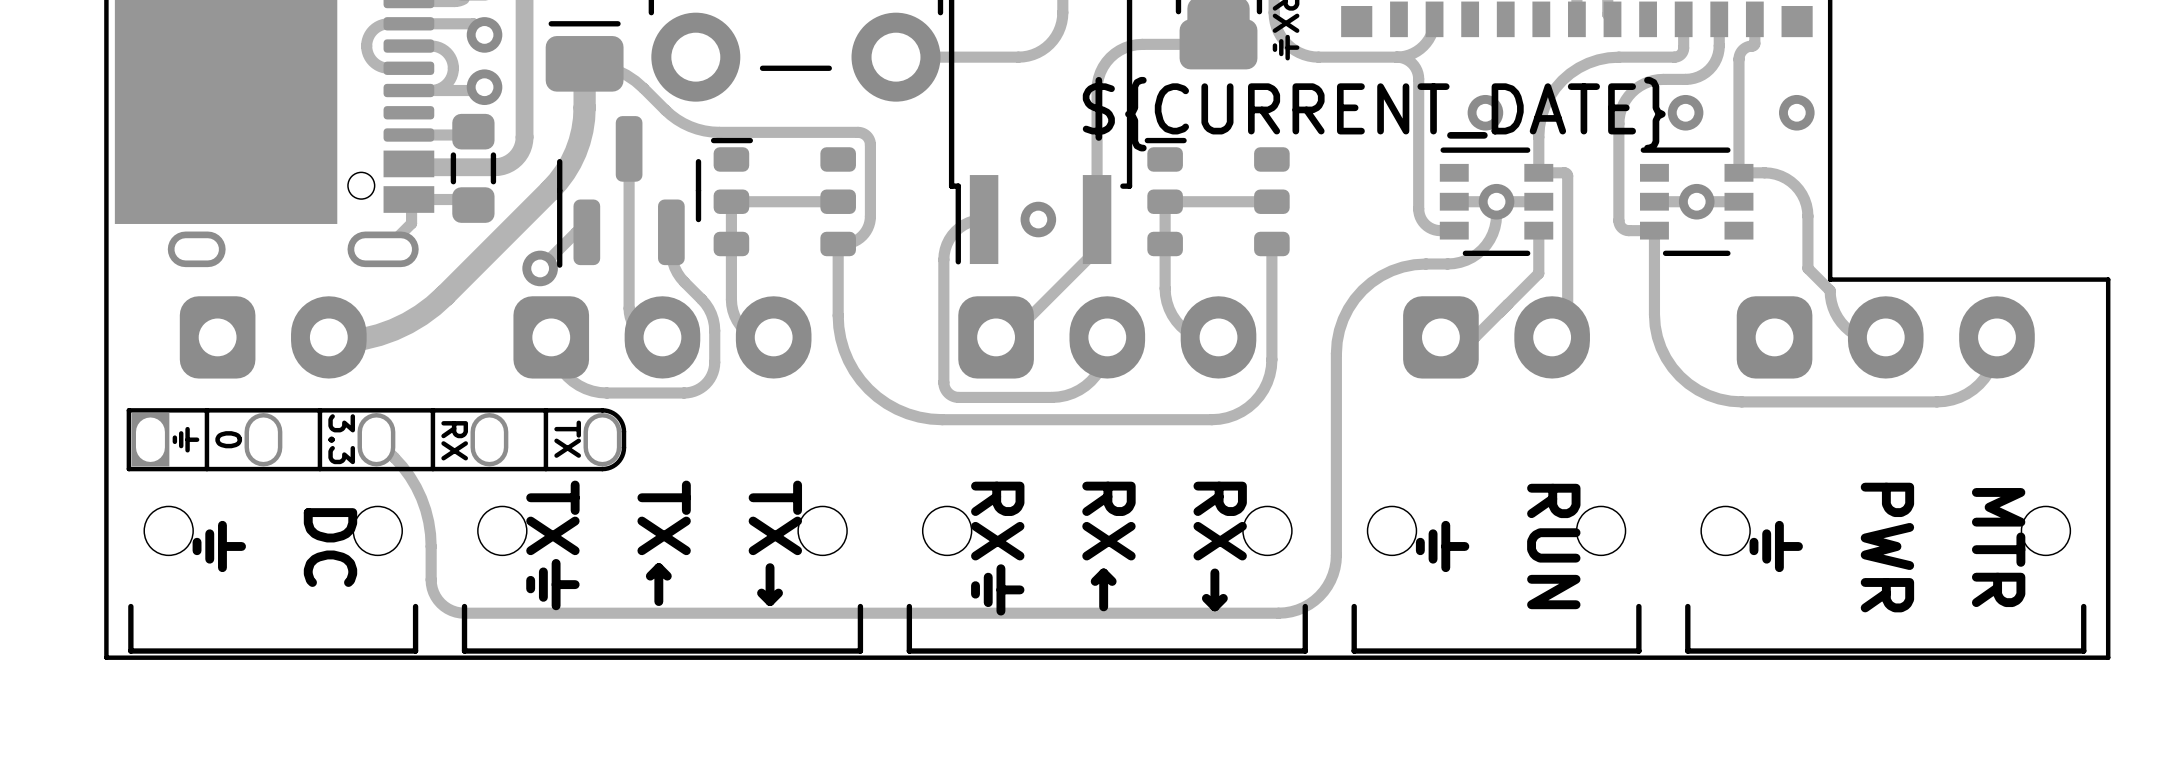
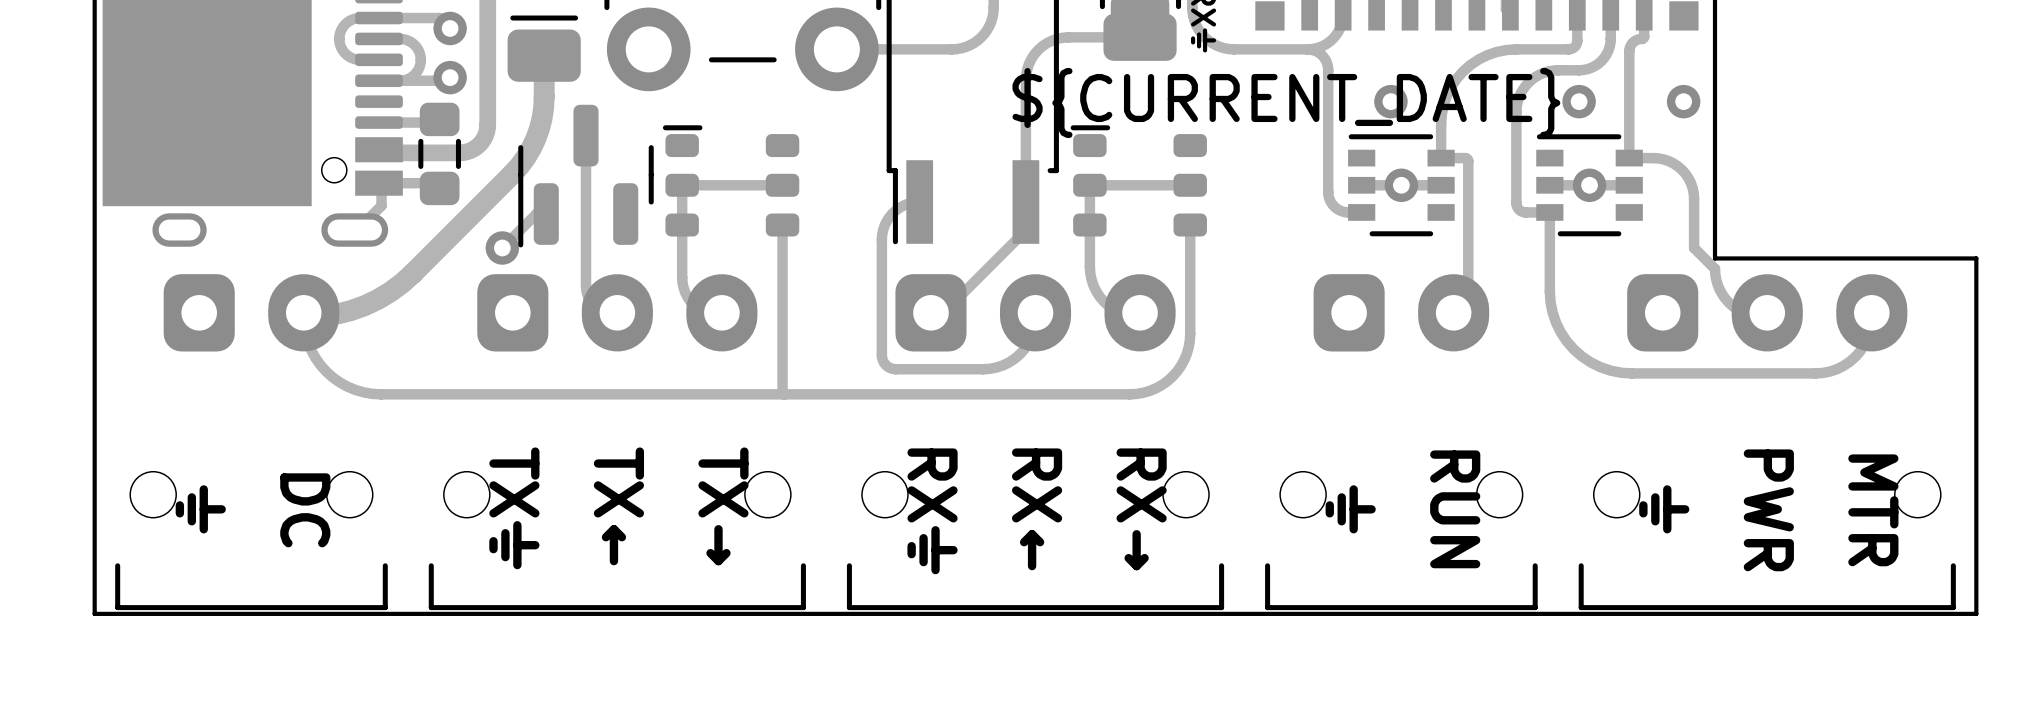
track: (584, 63) (606, 66) (626, 75) (643, 88) (670, 115) (697, 129) (719, 132) (857, 132) (865, 134) (870, 144) (869, 222) (864, 233) (857, 239) (848, 243) (838, 243) -> none
track: (1496, 201) (1496, 221) (1492, 233) (1486, 244) (1477, 253) (1466, 260) (1453, 263) (1414, 264) (1391, 270) (1371, 282) (1354, 299) (1348, 308) (1339, 330) (1336, 353) (1334, 568) (1330, 580) (1319, 596) (1309, 604) (1291, 611) (460, 612) (444, 606) (433, 592) (431, 584) (428, 521) (416, 487) (402, 466) (376, 439) -> none
via: (1038, 219) -> none
track: (1538, 230) (1538, 273) (1474, 337) (1440, 337) -> none
track: (671, 232) (671, 256) (674, 267) (680, 277) (705, 303) (713, 319) (714, 365) (710, 378) (703, 386) (694, 391) (684, 393) (606, 393) (592, 391) (573, 381) (562, 371) (555, 358) (551, 337) -> none
track: (838, 315) (844, 350) (854, 371) (868, 389) (897, 409) (930, 419) (1219, 419) (1234, 415) (1254, 402) (1267, 382) (1271, 359) -> (782, 292) (782, 392) (784, 394)
track: none -> (303, 316) (308, 342) (315, 358) (326, 371) (339, 382) (355, 390) (381, 394) (1136, 393) (1155, 388) (1172, 376) (1184, 360) (1188, 347) (1190, 333)
part: (376, 439) -> none

